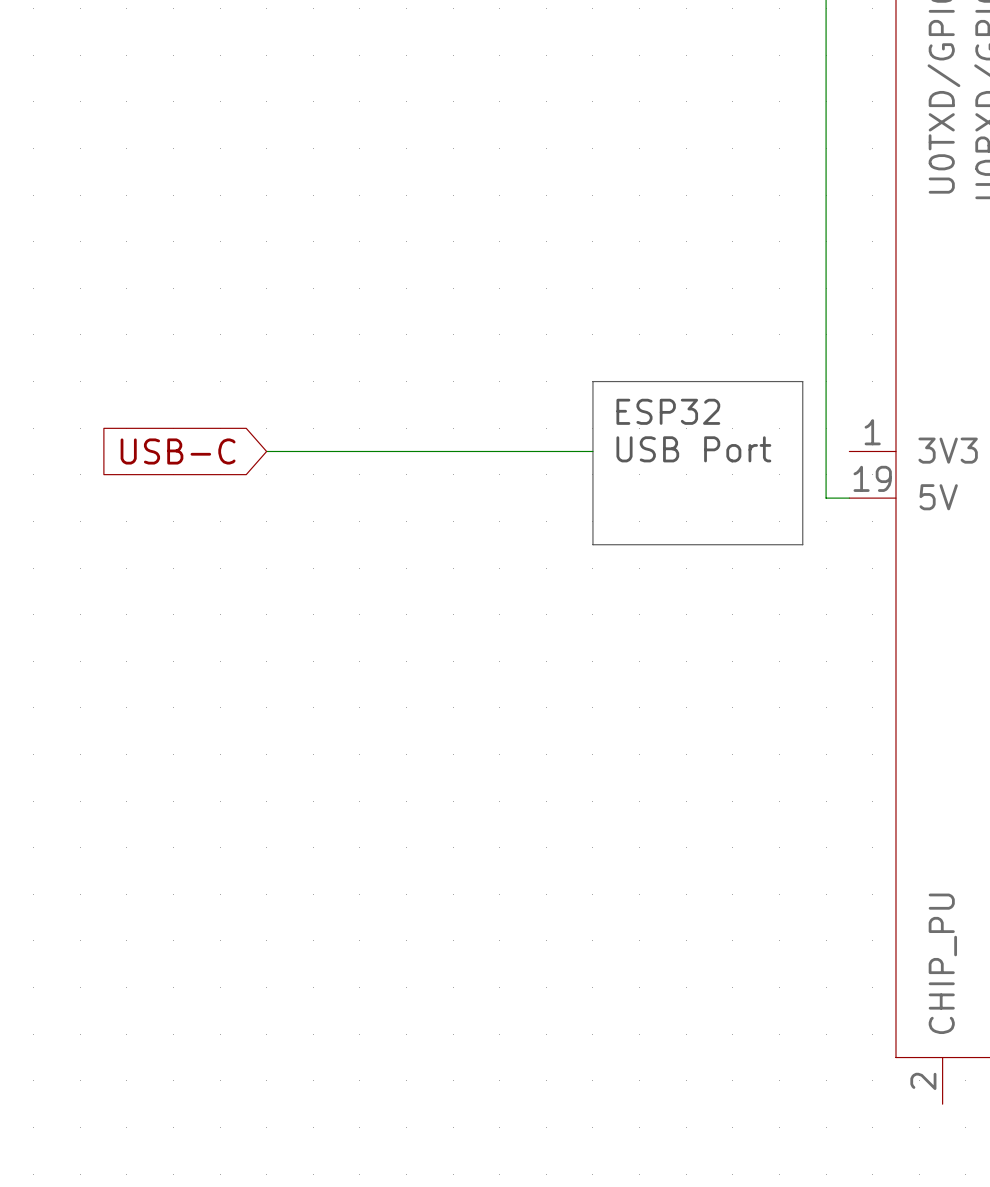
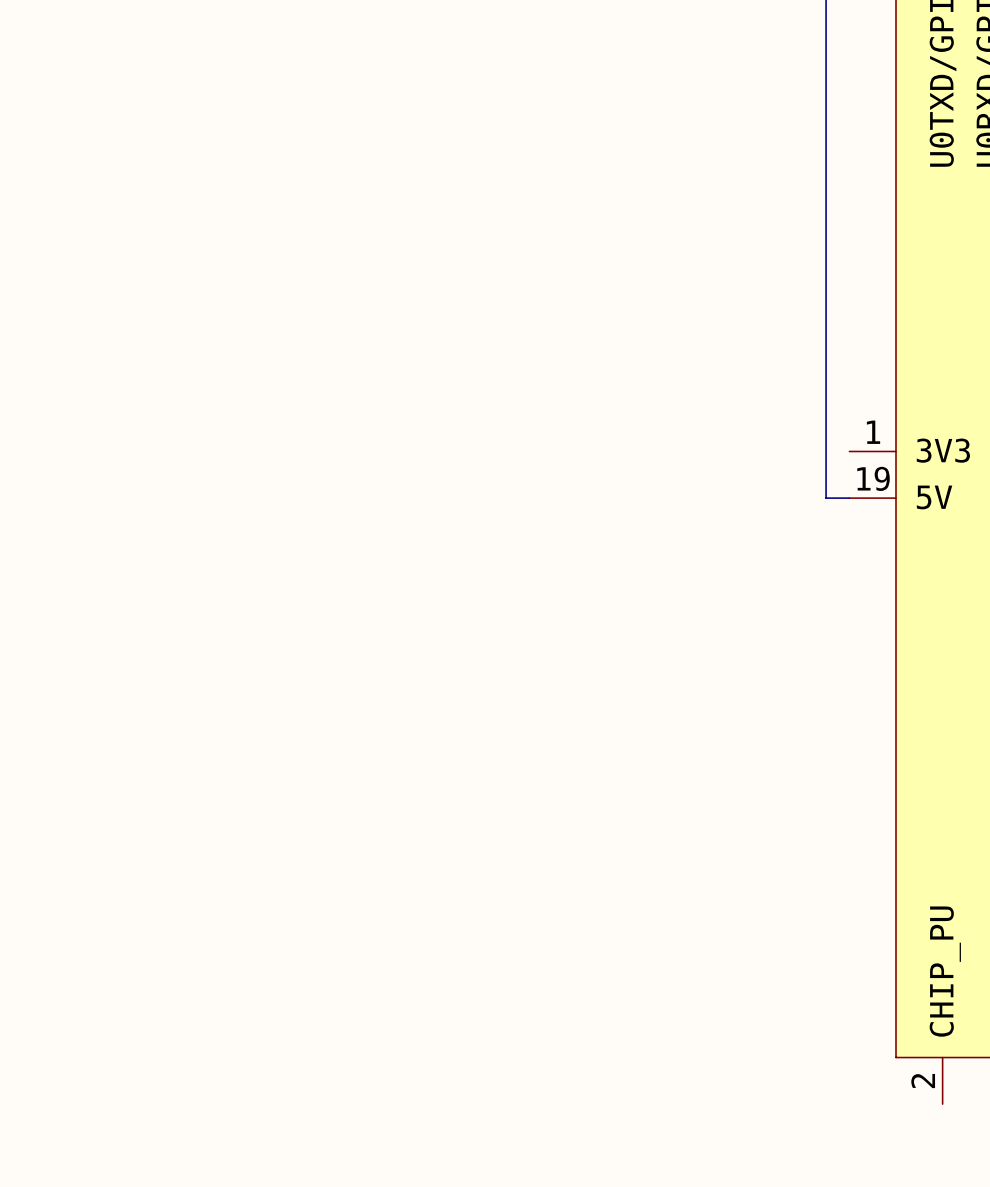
line: (592, 381) (802, 381) (802, 544) (592, 544) (592, 381) -> none
text: ESP32 (668, 411) -> none
text: USB Port (693, 449) -> none
global label: USB-C (178, 451) -> none
wire: (266, 451) (592, 451) -> none

